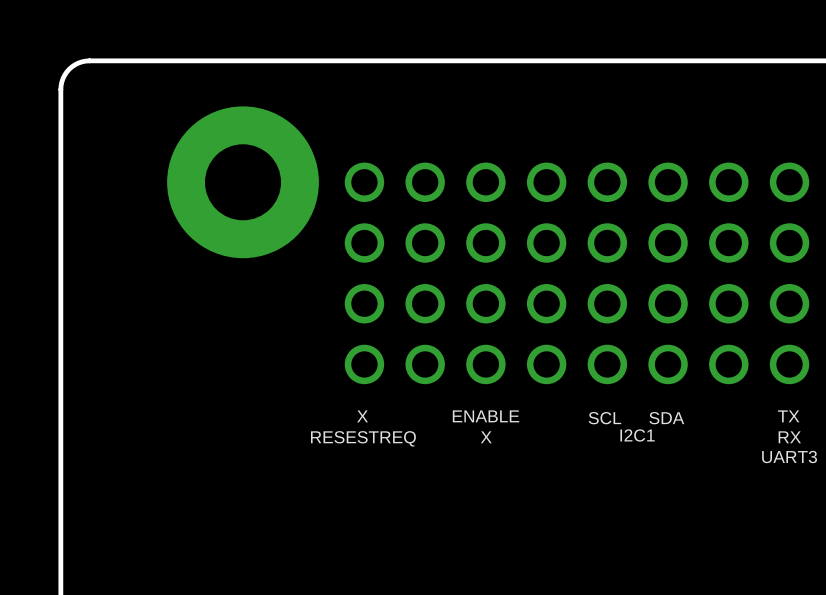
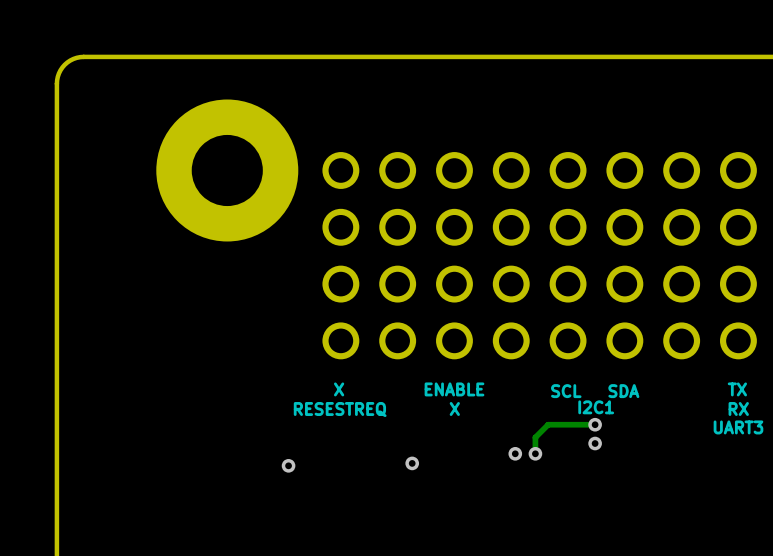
track: none -> (595, 424) (548, 424) (535, 437) (535, 453)
via: none -> (595, 424)
via: none -> (595, 443)
via: none -> (515, 453)
via: none -> (535, 453)
via: none -> (412, 463)
via: none -> (288, 465)

